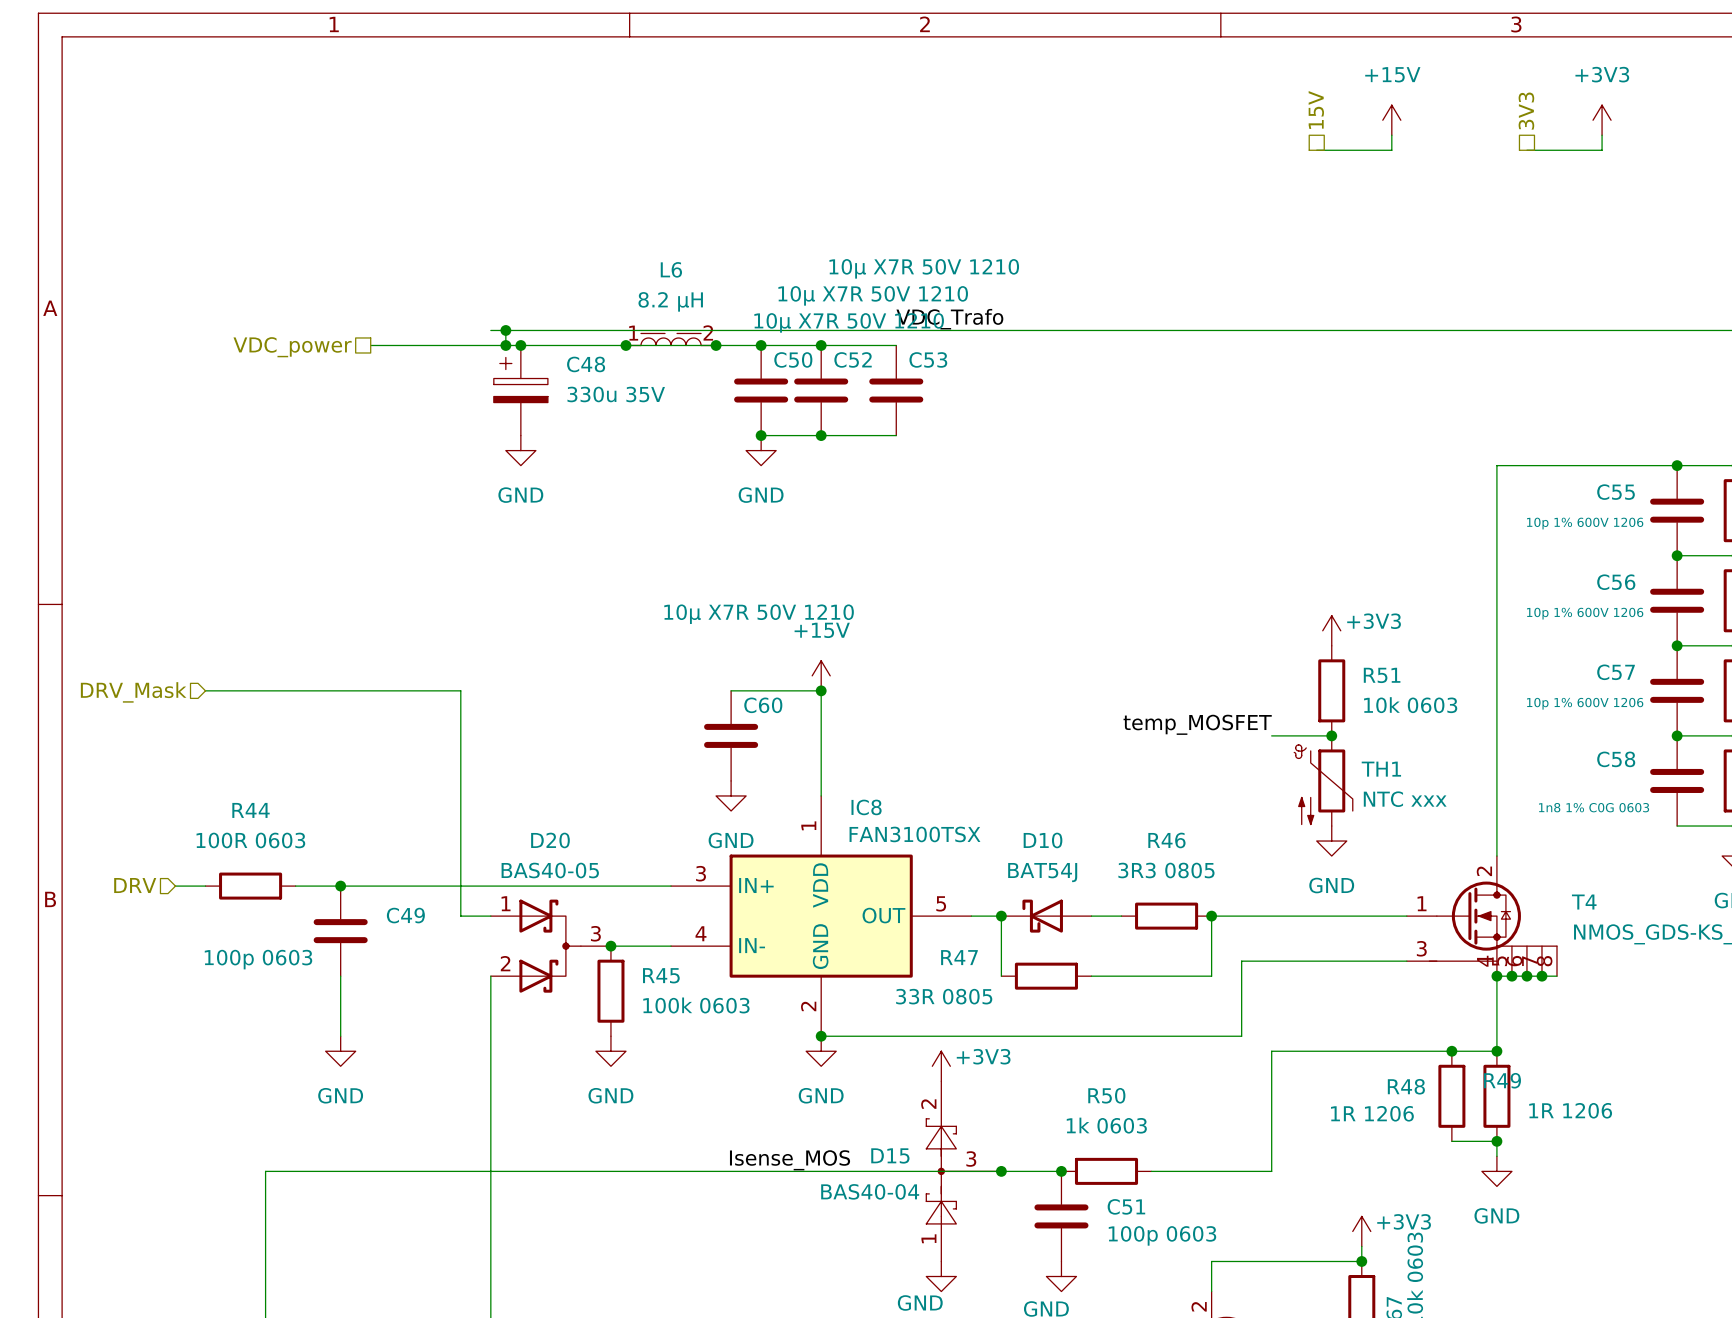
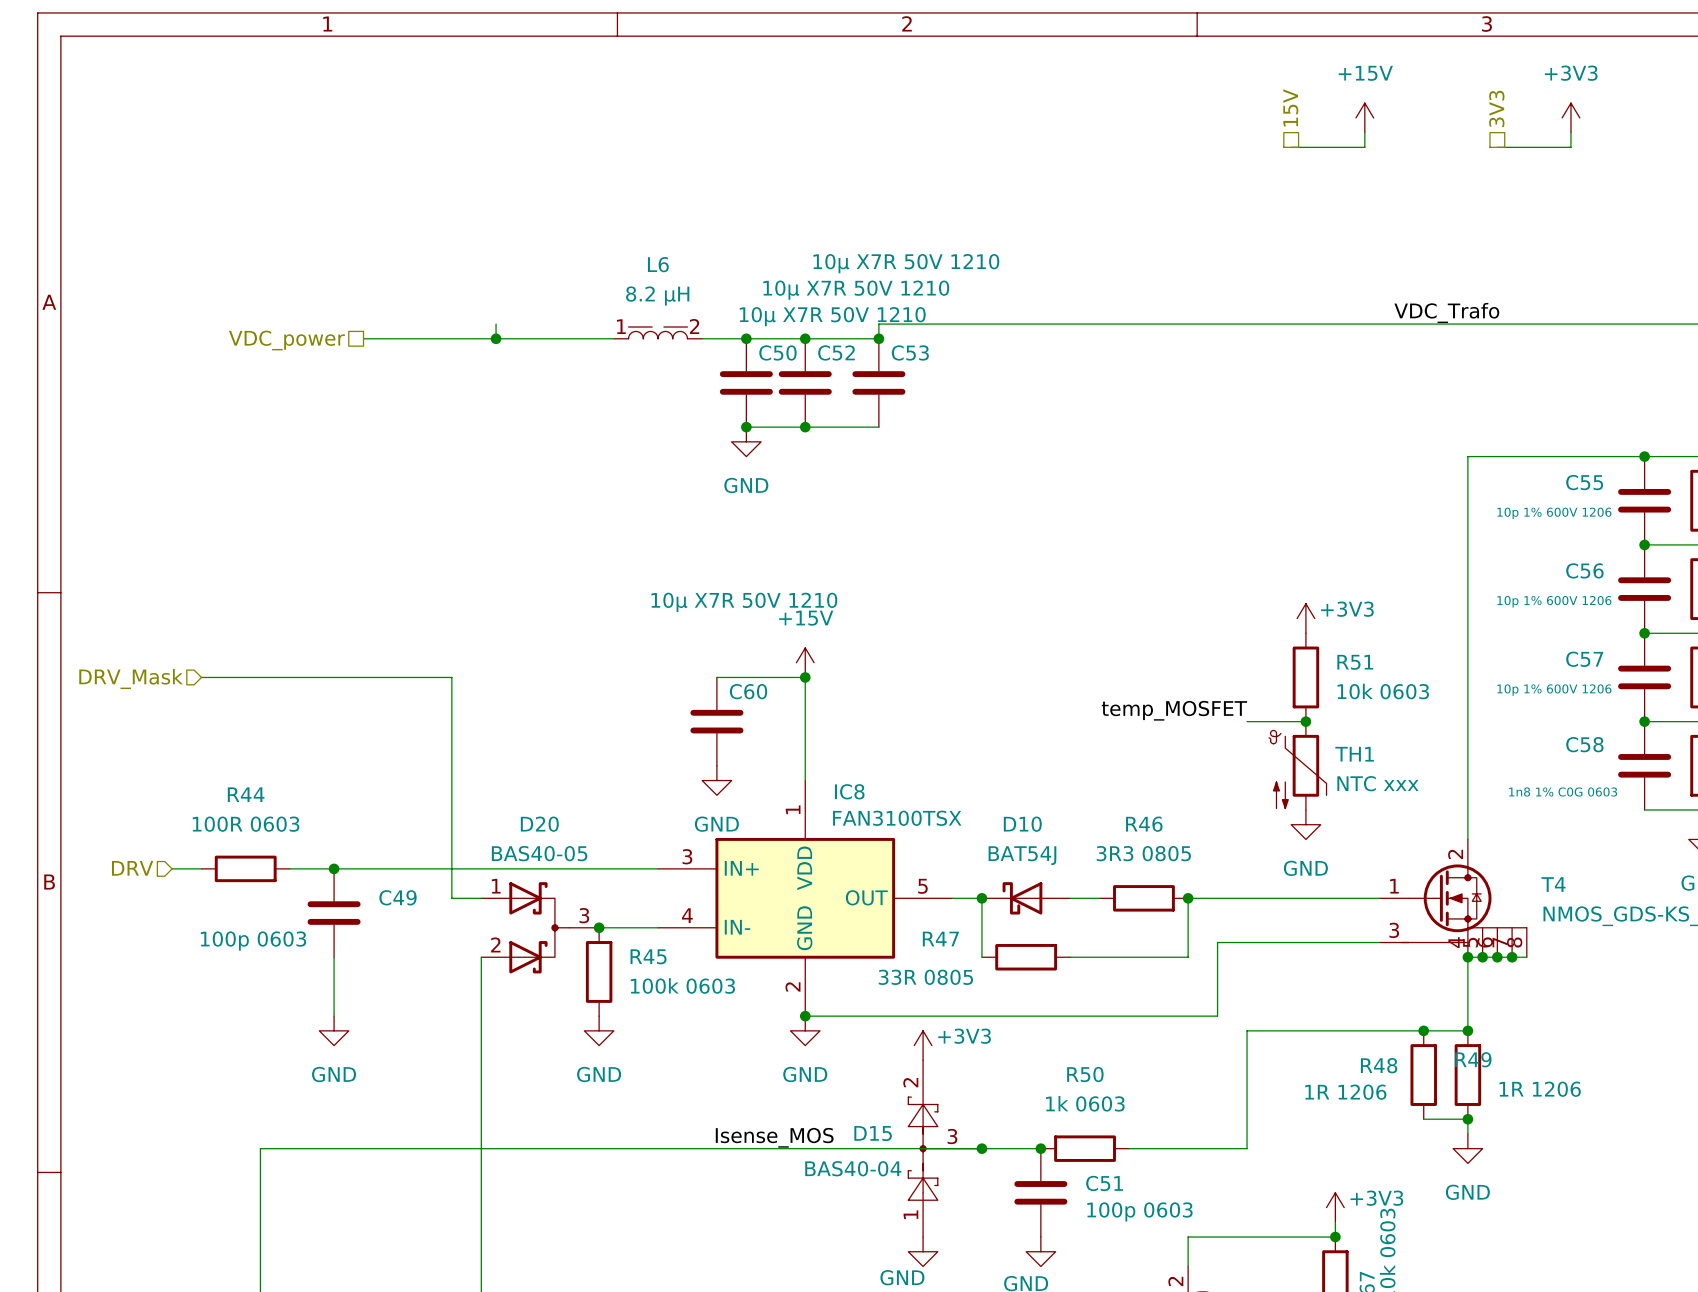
label: VDC_Trafo (949, 319) -> none
label: none -> VDC_Trafo (1446, 312)
wire: (490, 330) (896, 330) -> (878, 338) (878, 324)
junction: (505, 330) -> none
junction: (520, 345) -> none
wire: (625, 345) (716, 345) -> none
junction: (625, 345) -> none
junction: (716, 345) -> none
junction: none -> (878, 338)
C48: 330u 35V (520, 390) -> none
power symbol: GND (520, 450) -> none

